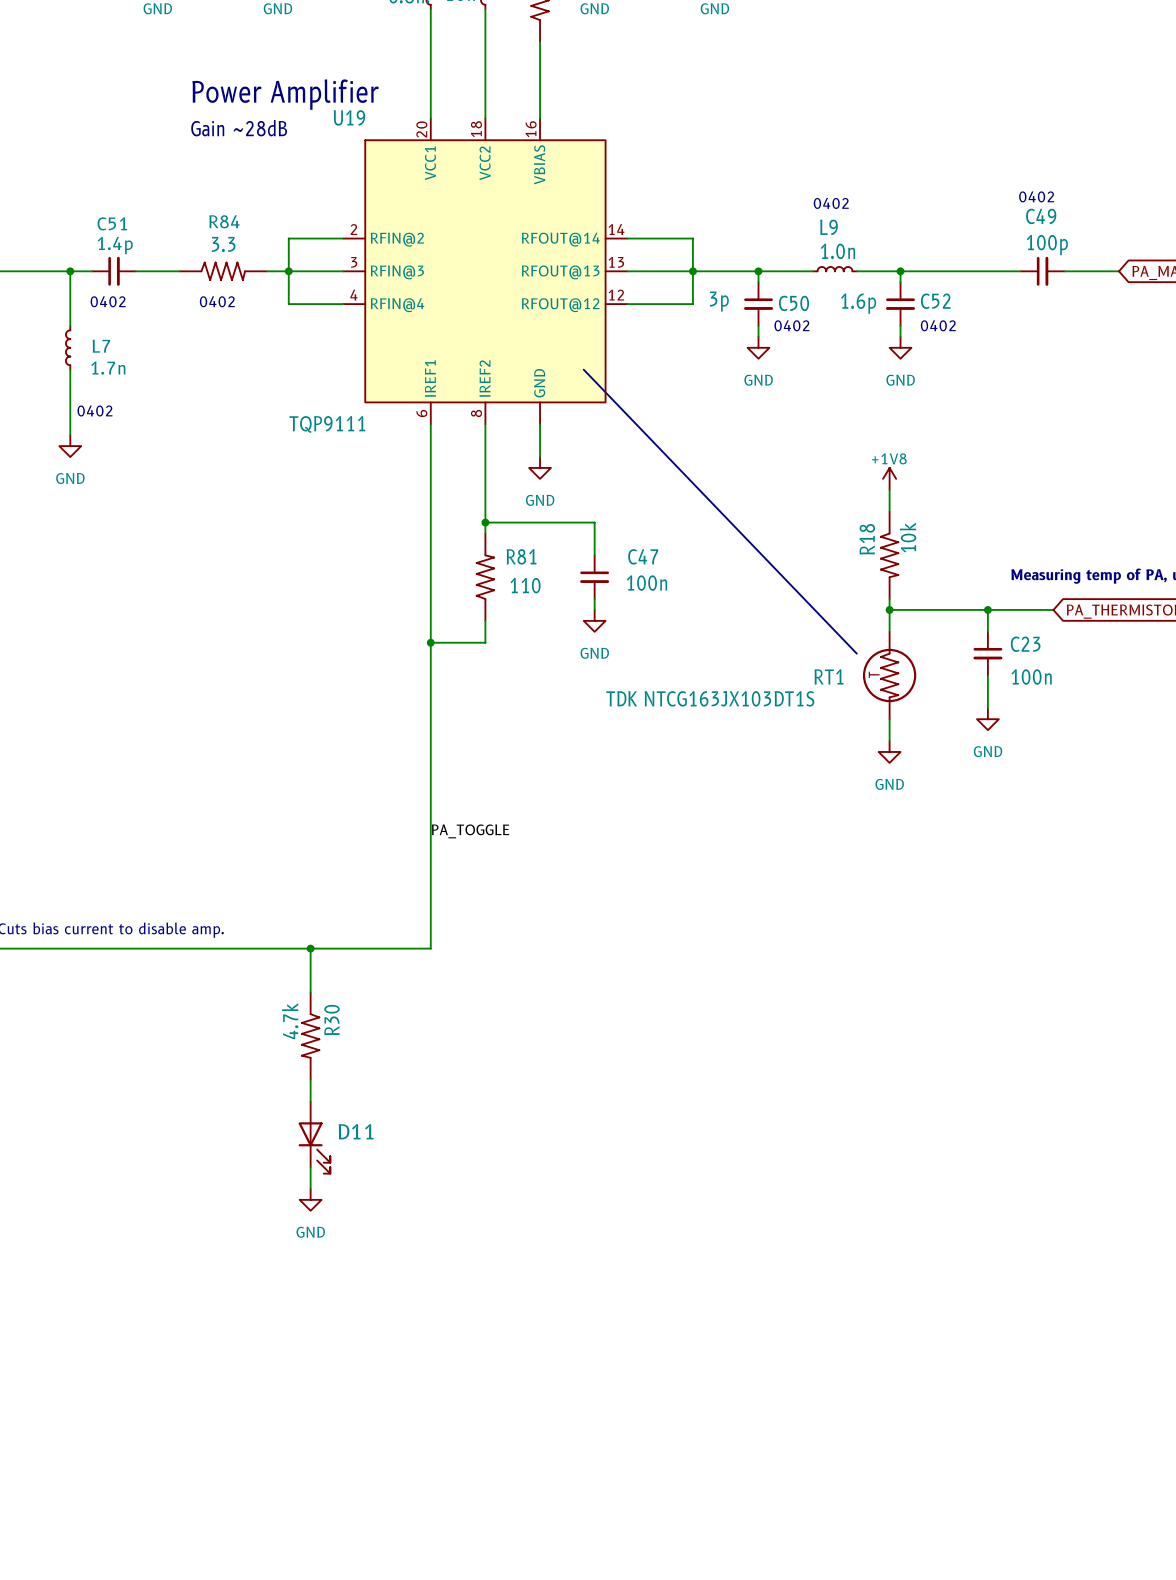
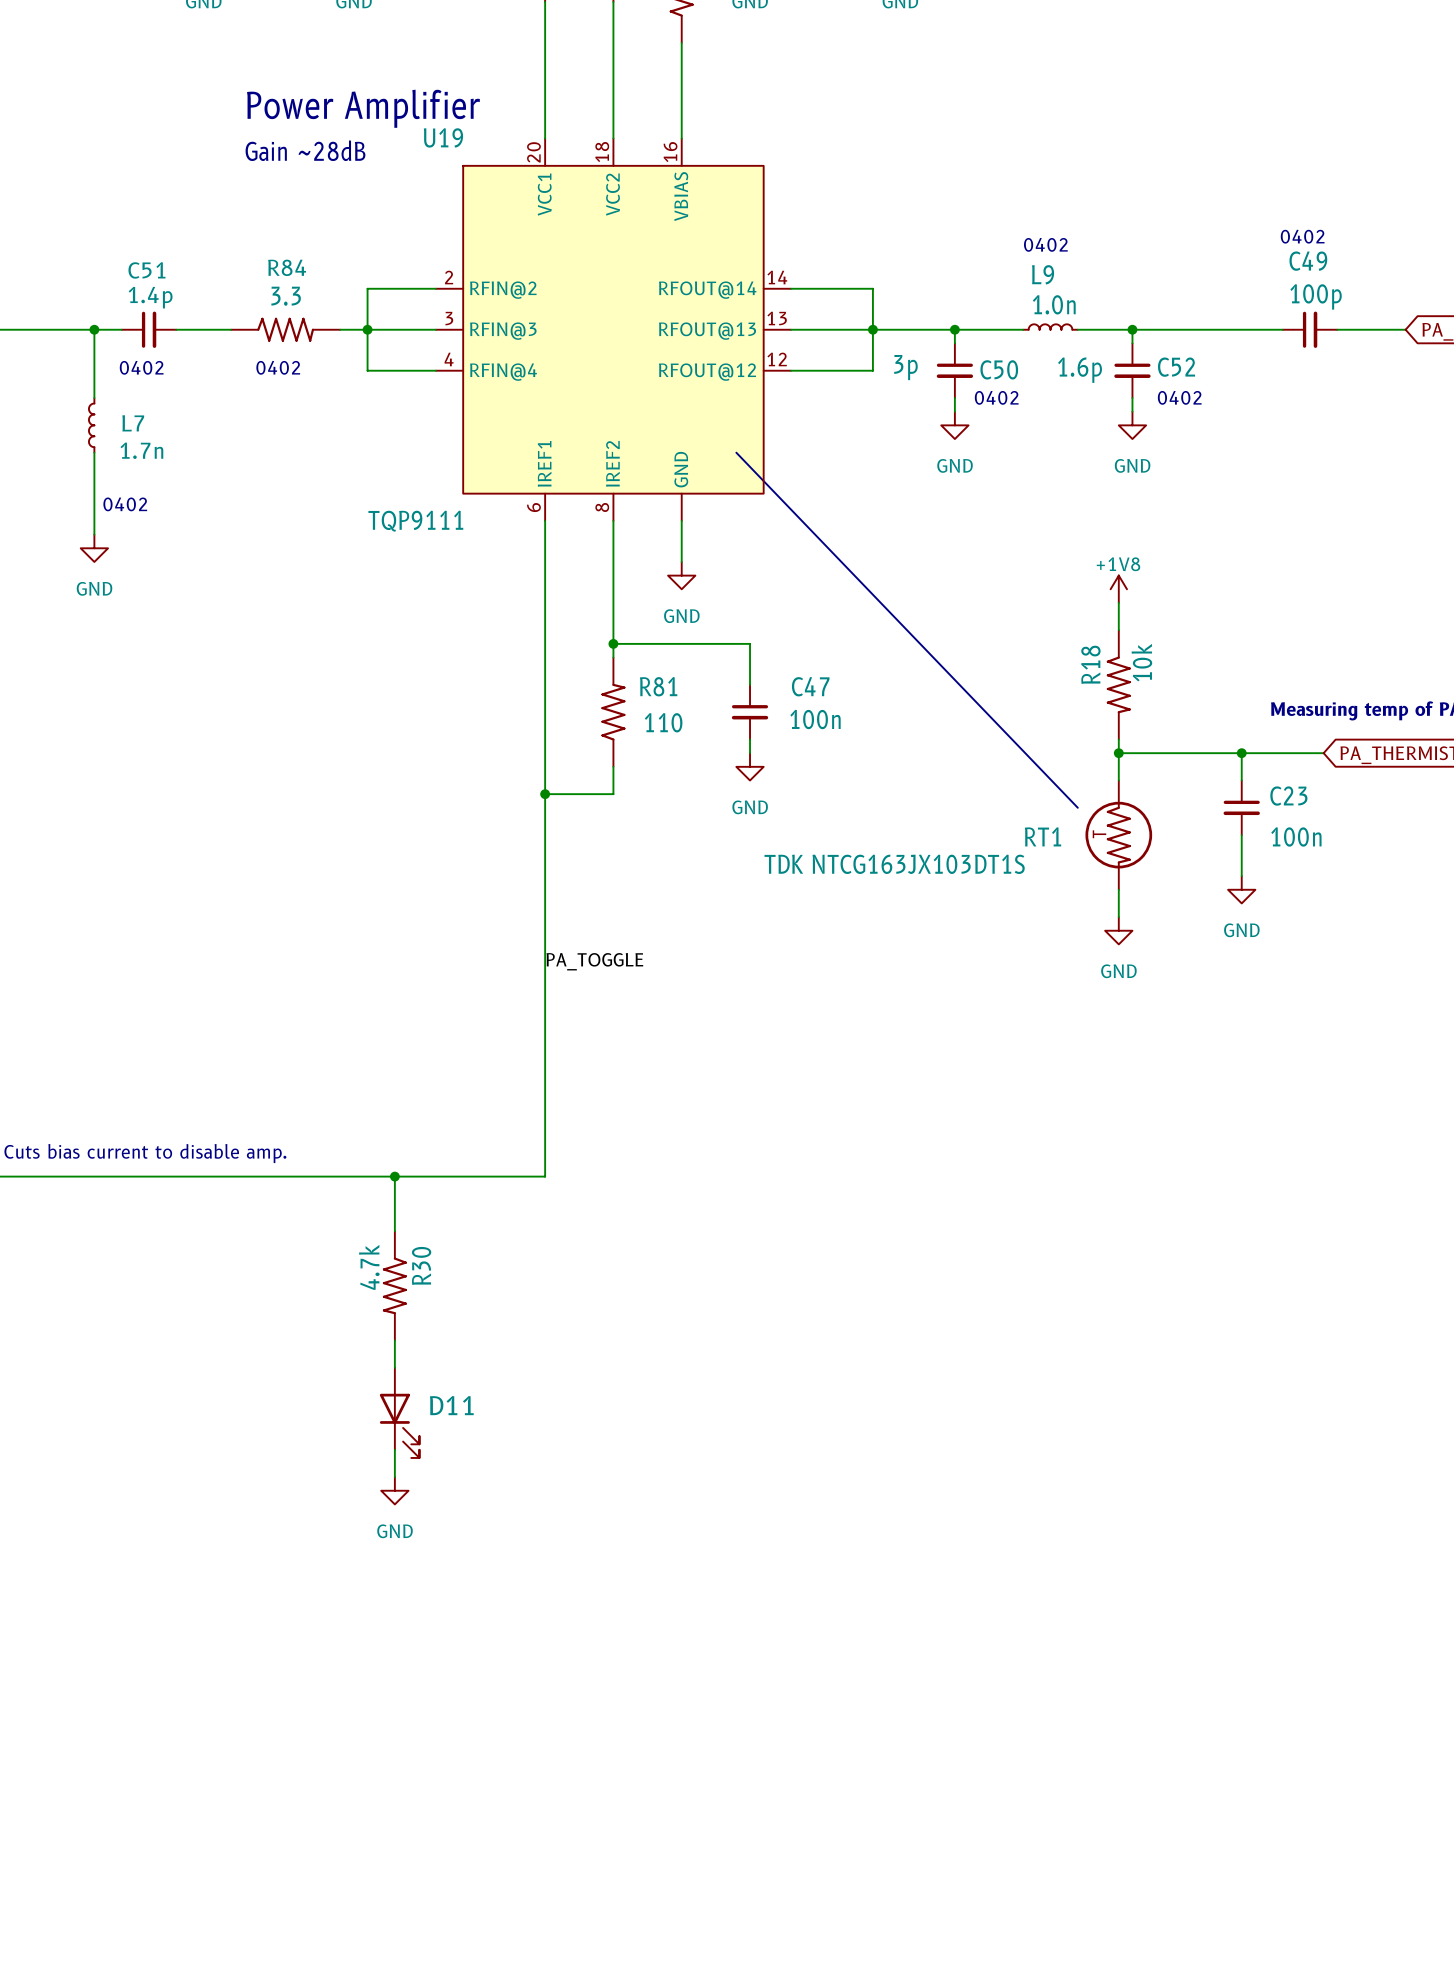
label position: PA_TOGGLE (470, 831) -> PA_TOGGLE (594, 961)

